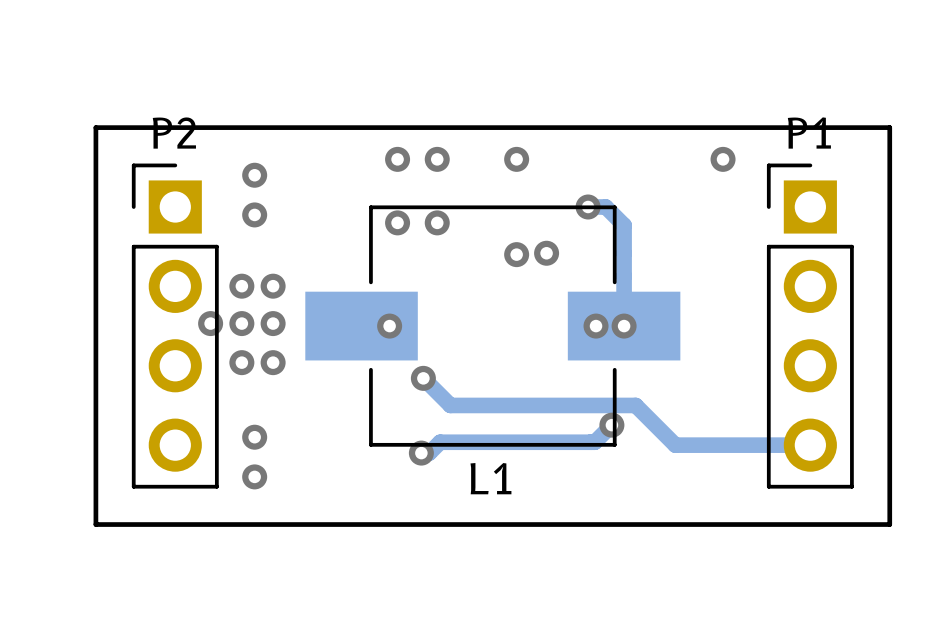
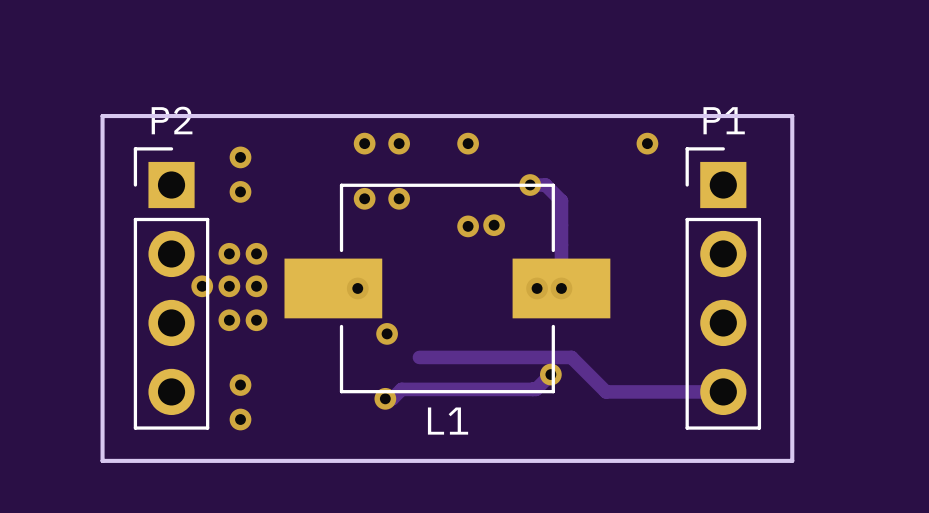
track: (422, 374) (422, 377) (450, 405) (460, 405) -> none

